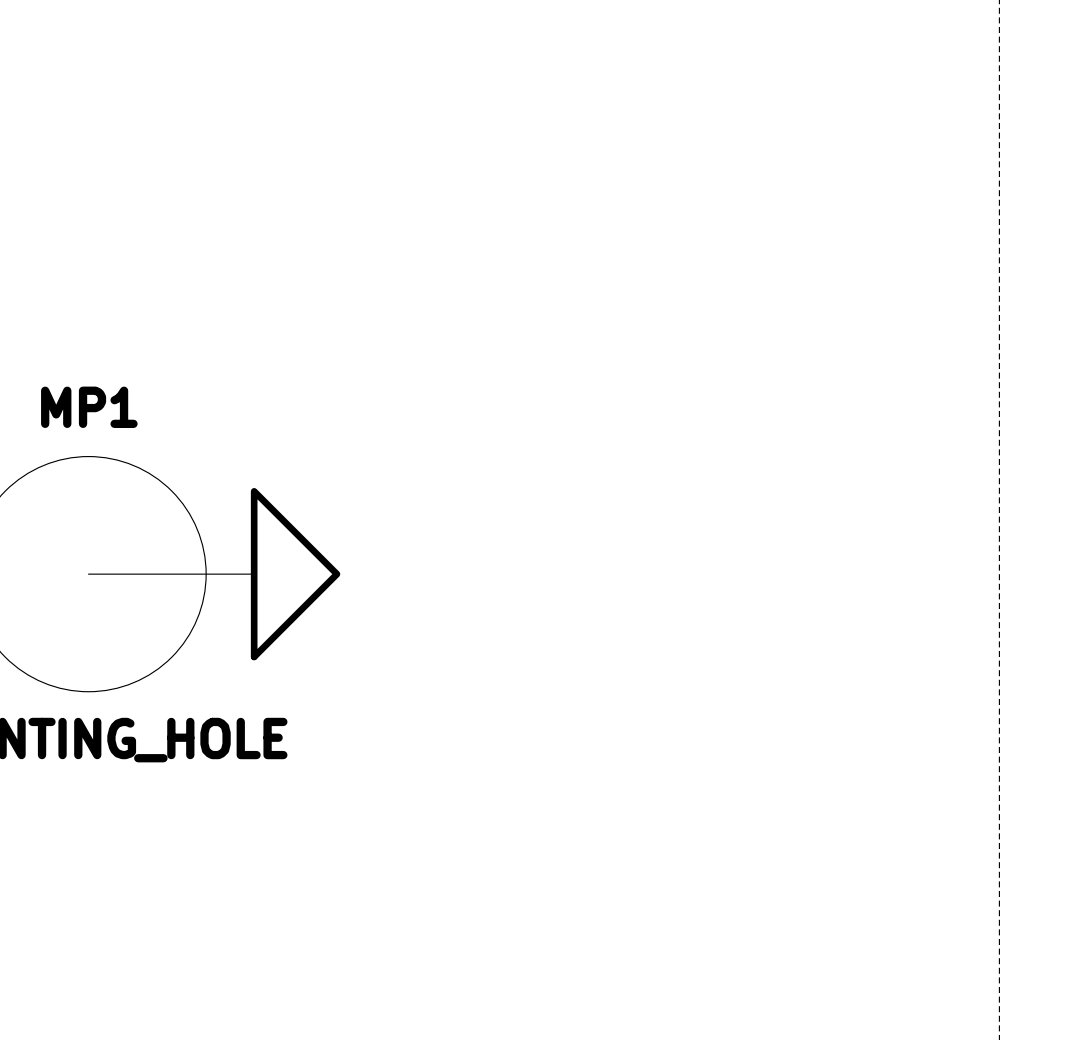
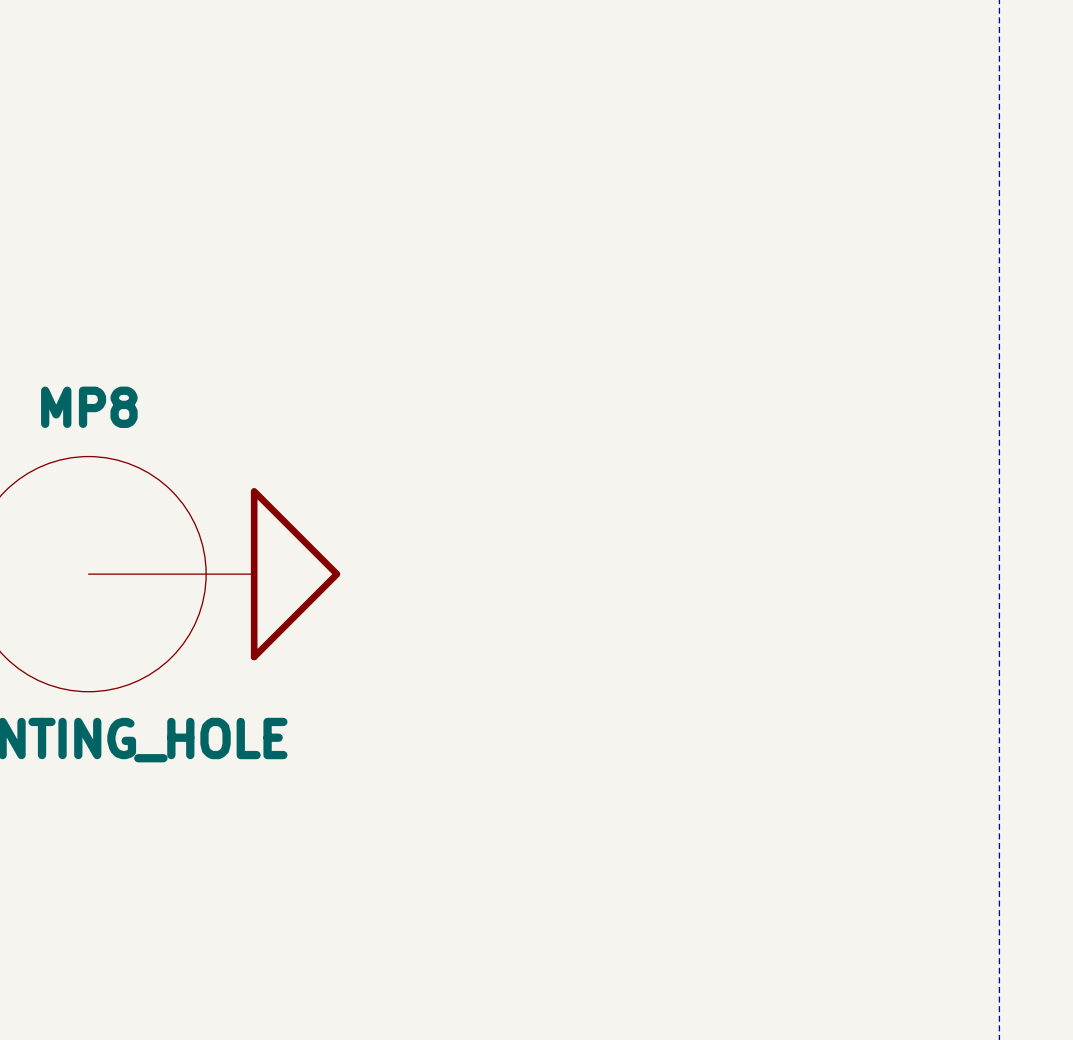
MP1 name: MP1 (89, 407) -> MP8 (89, 407)

